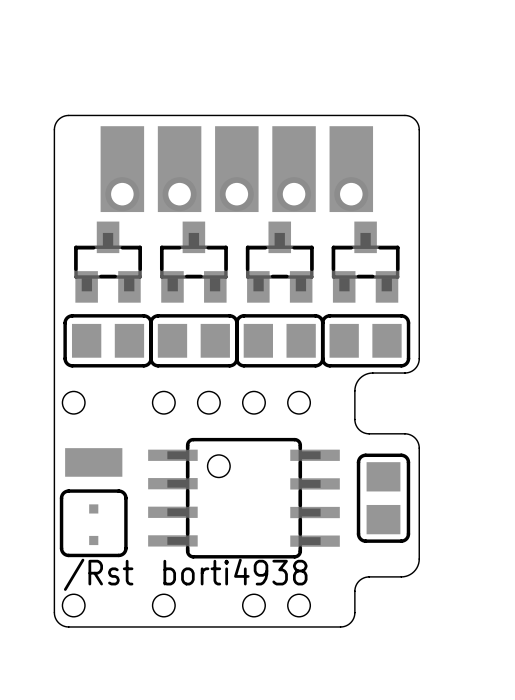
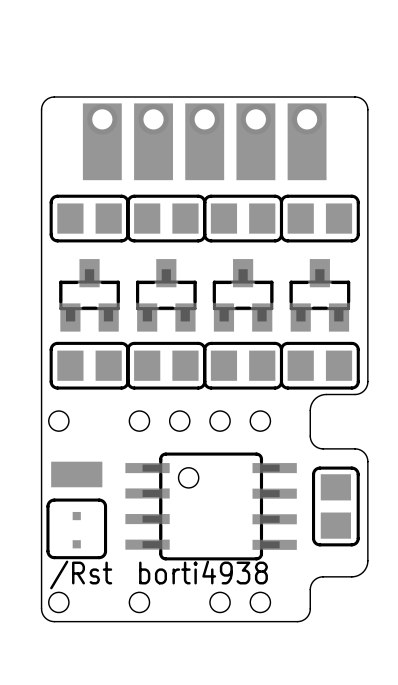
part: none -> (102, 141)
part: none -> (153, 141)
part: none -> (204, 141)
part: none -> (255, 141)
part: none -> (307, 141)
part footprint: [100, 126, 145, 213] -> [49, 194, 130, 243]
part footprint: [157, 126, 202, 213] -> [126, 194, 207, 243]
part footprint: [272, 126, 316, 213] -> [203, 194, 284, 243]
part footprint: [329, 126, 374, 213] -> [279, 194, 360, 243]
board edge: (54, 129) (58, 119) (68, 115) (404, 115) (415, 119) (419, 129) -> (41, 176) (41, 108) (46, 99) (54, 96) (358, 97) (365, 102) (367, 108) (367, 176)
part: (236, 169) -> none

